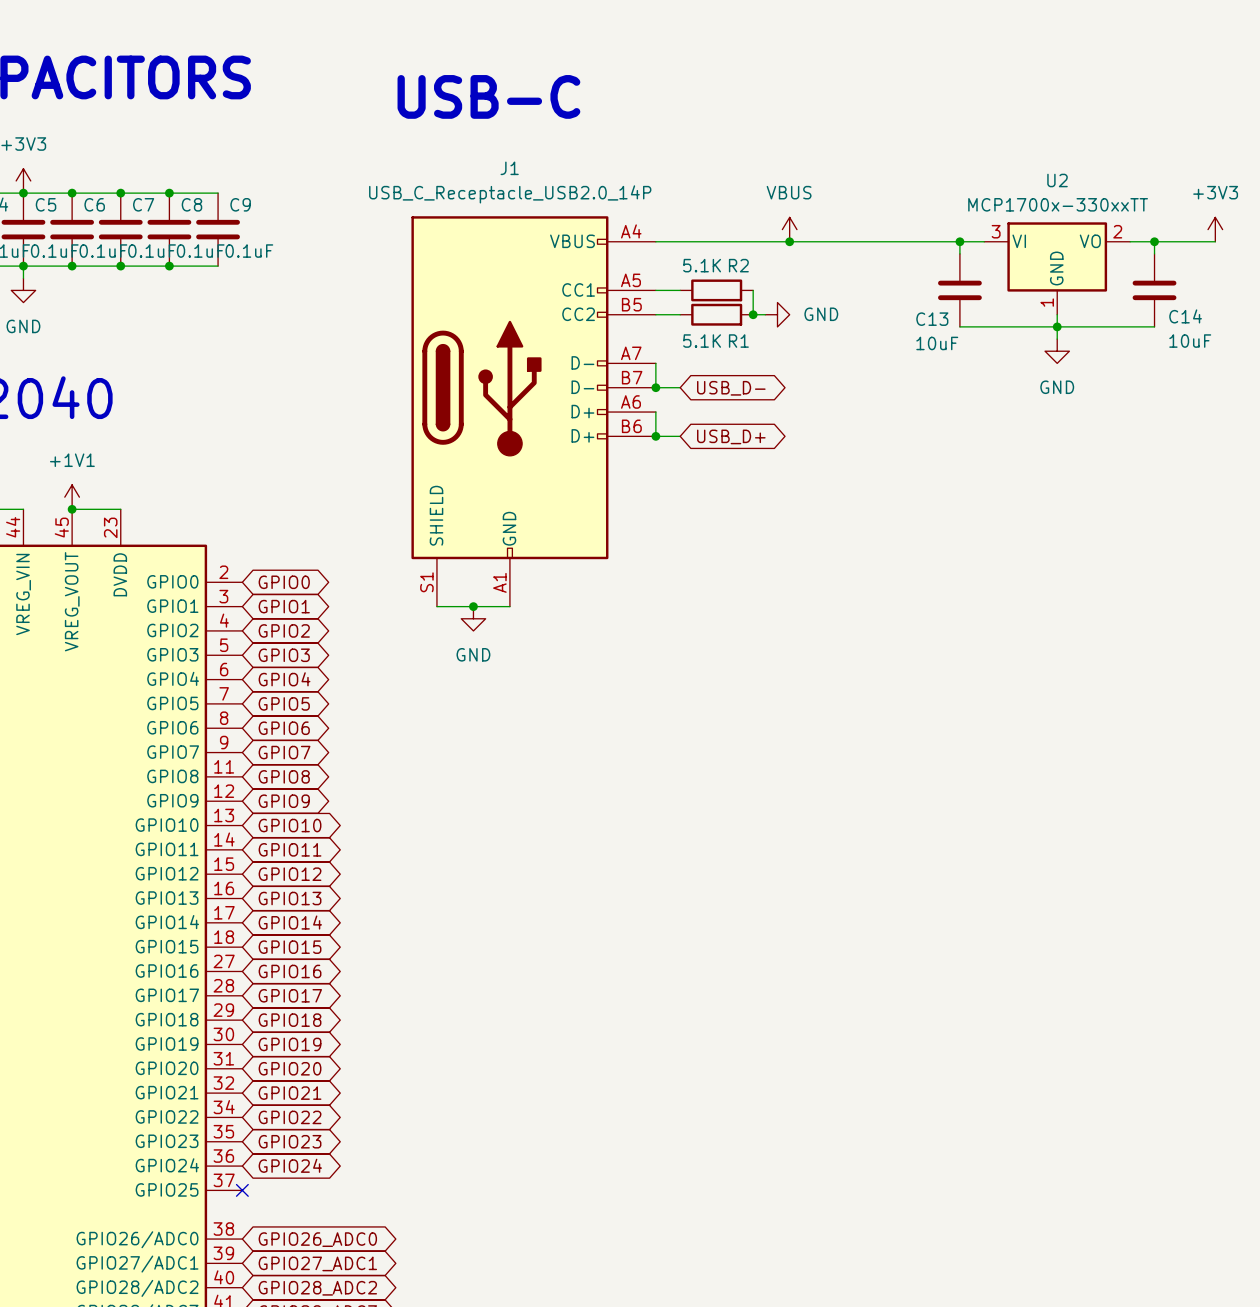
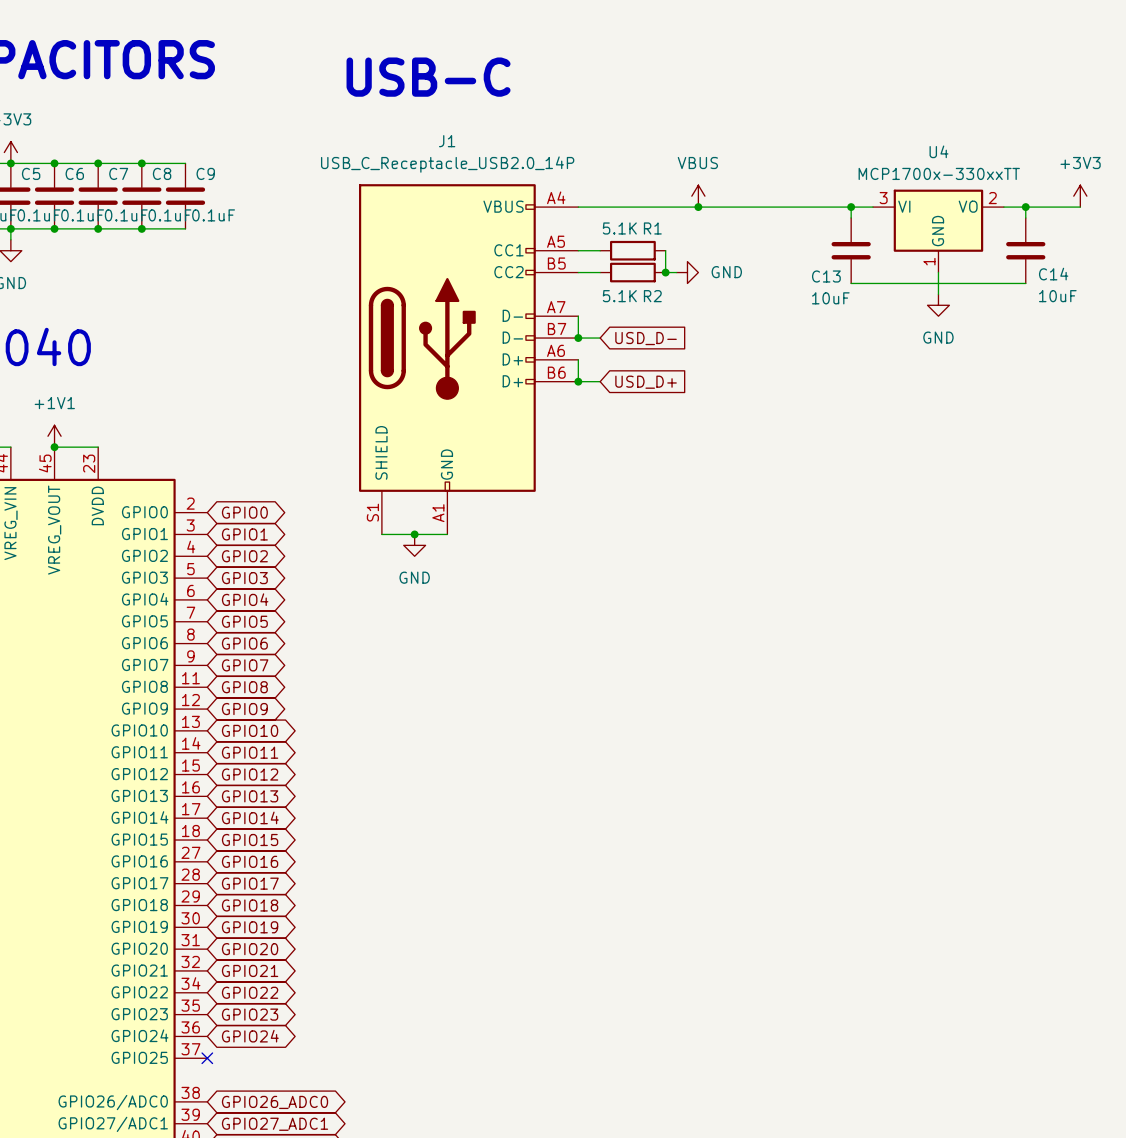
U2 name: U2 (1057, 180) -> U4 (938, 151)
R2 name: R2 (738, 265) -> R1 (652, 228)
junction: (1057, 326) -> none
R1 name: R1 (738, 341) -> R2 (652, 296)
global label shape: bidirectional (731, 388) -> input (646, 338)
global label: USB_D- (731, 388) -> USD_D- (646, 338)
global label shape: bidirectional (731, 436) -> input (646, 382)
global label: USB_D+ (731, 436) -> USD_D+ (646, 382)

